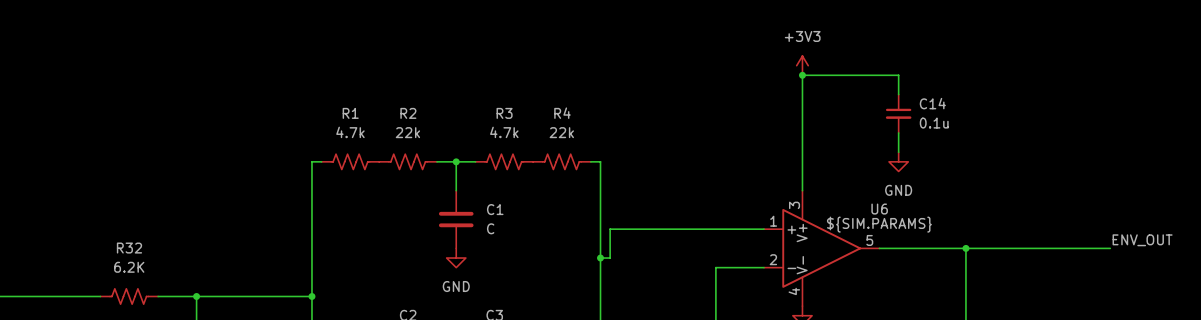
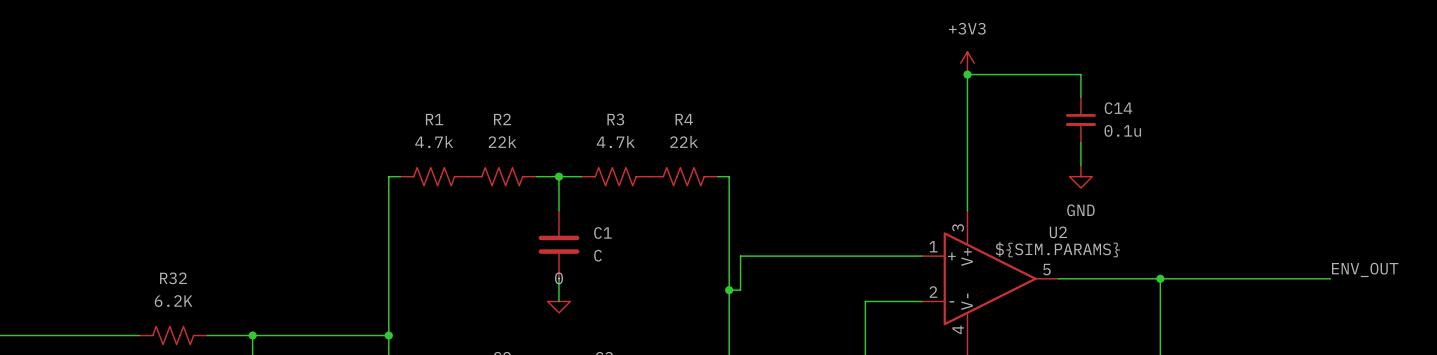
U6 name: U6 (879, 209) -> U2 (1058, 232)
power symbol: GND (456, 258) -> none
power symbol: none -> 0 (559, 307)

